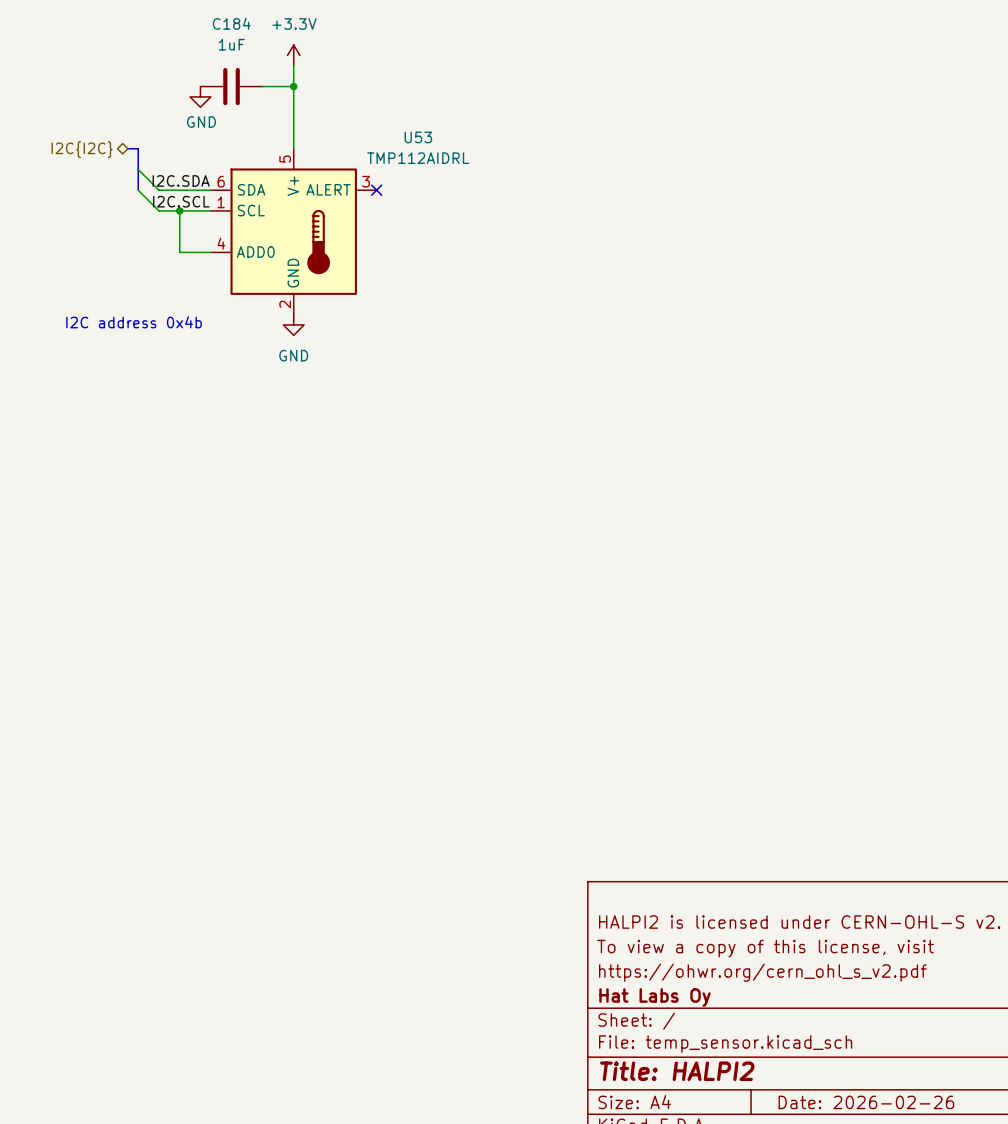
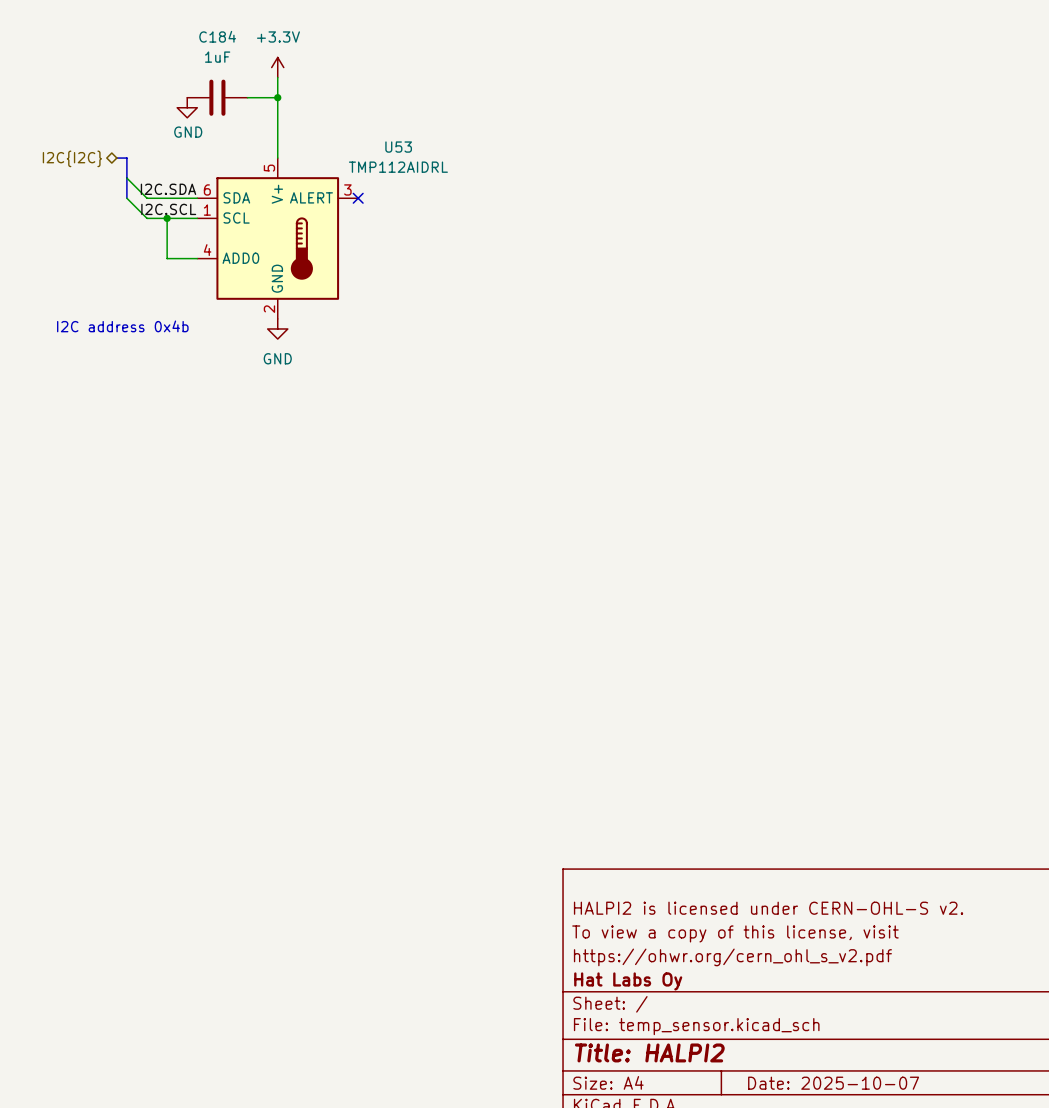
title block: Date: 2026-02-26 (866, 1102) -> Date: 2025-10-07 (833, 1083)

